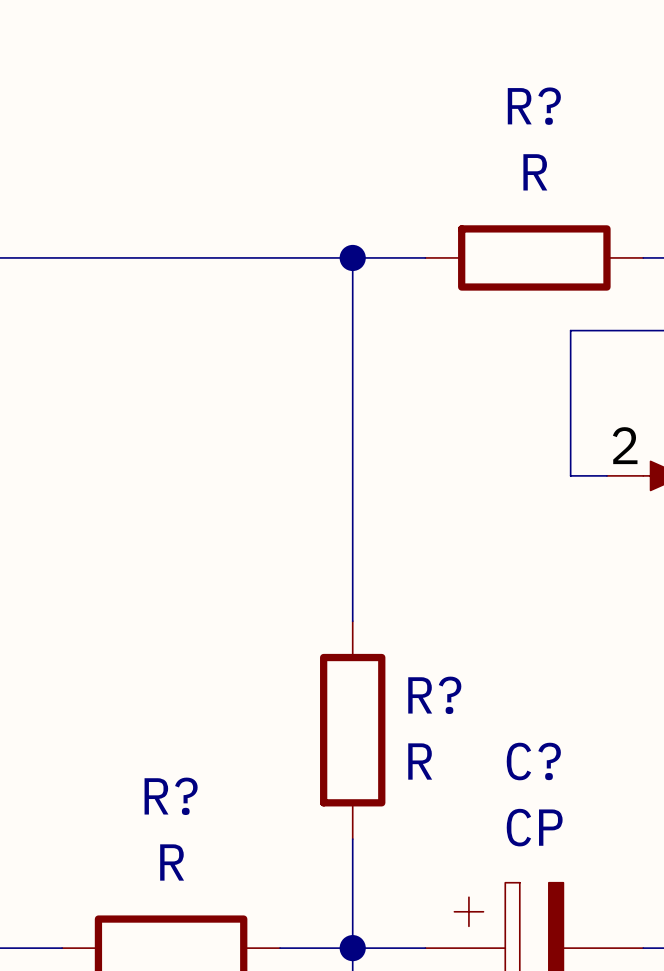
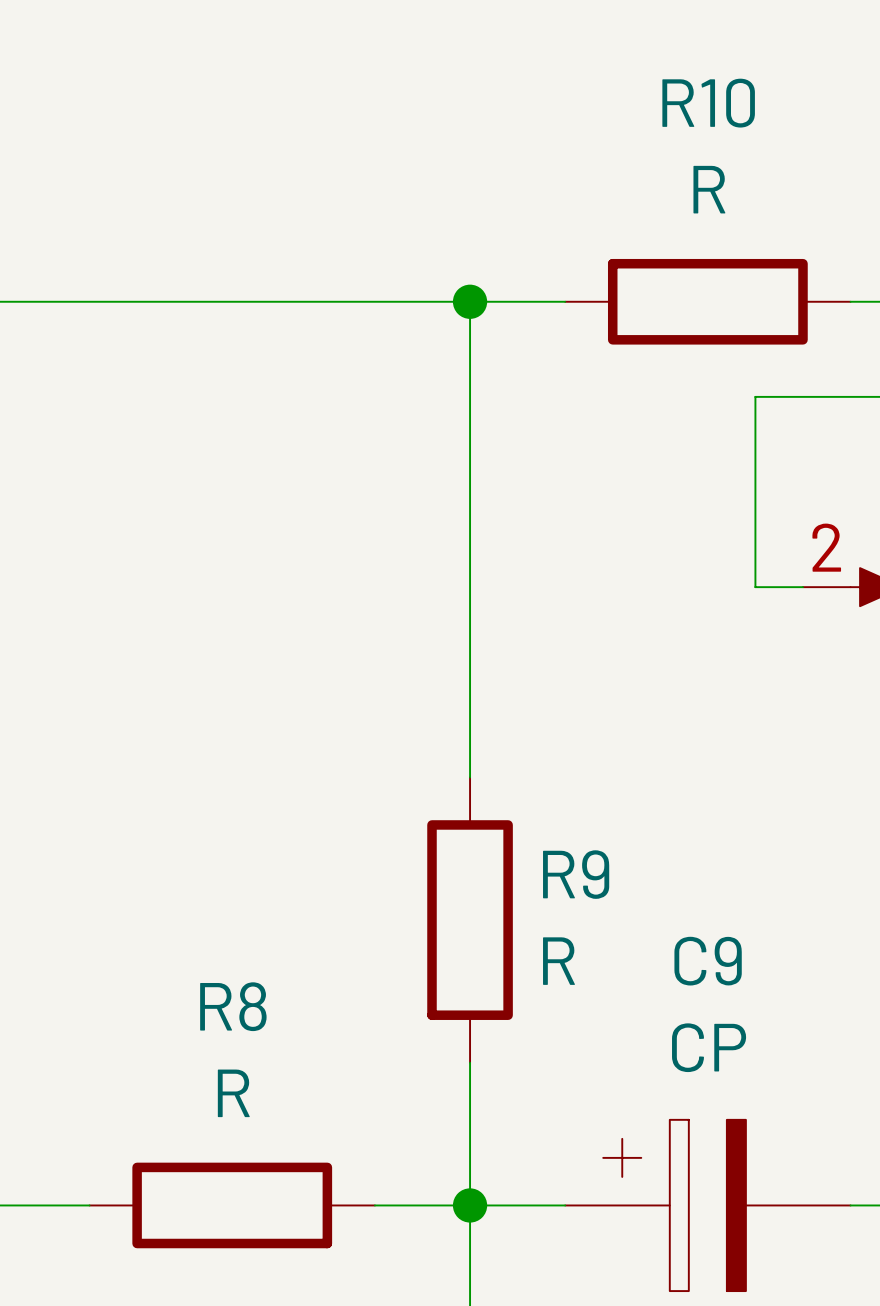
R? name: R? (534, 106) -> R10 (708, 103)
R? name: R? (434, 695) -> R9 (576, 874)
C? name: C? (533, 761) -> C9 (708, 961)
R? name: R? (171, 796) -> R8 (233, 1006)

